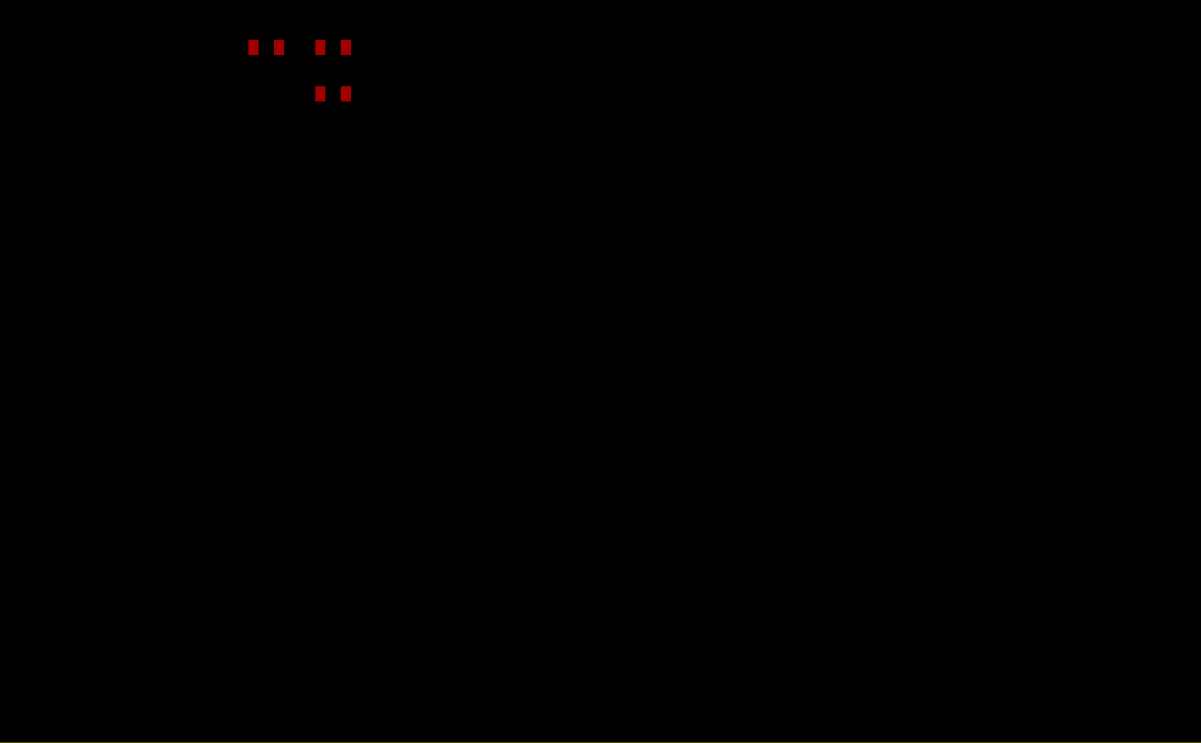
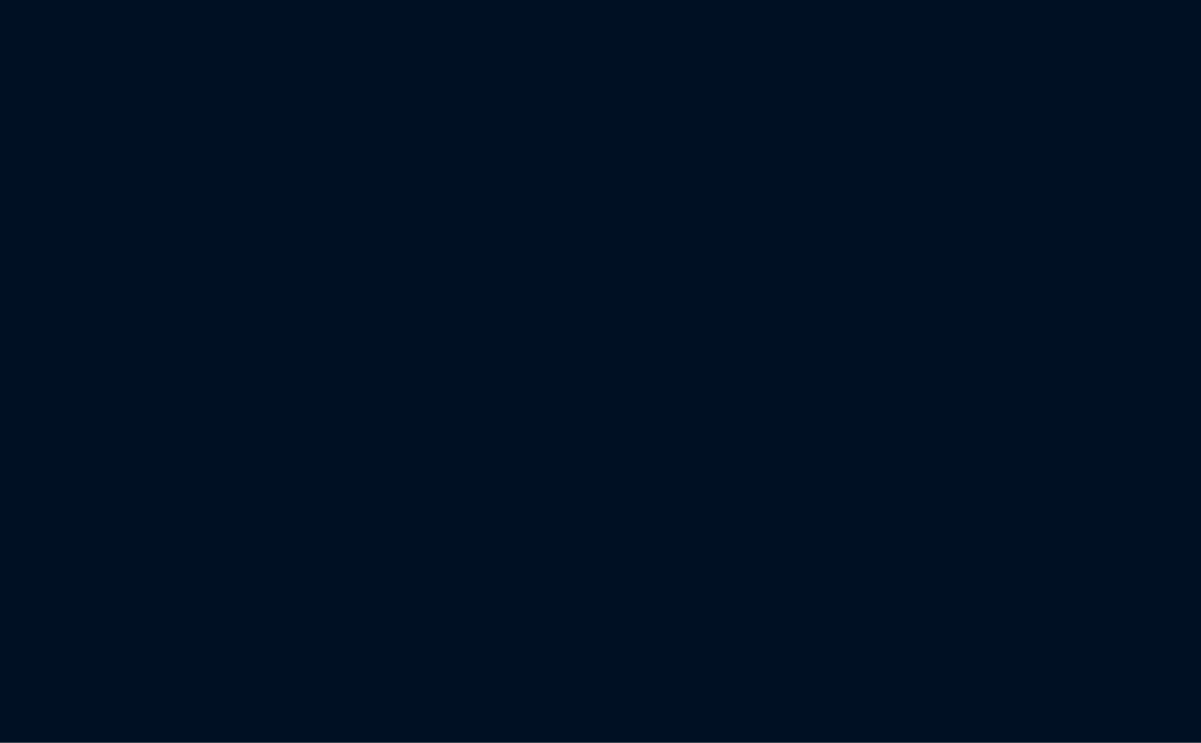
part: (266, 47) -> none
part: (333, 47) -> none
part: (333, 93) -> none

